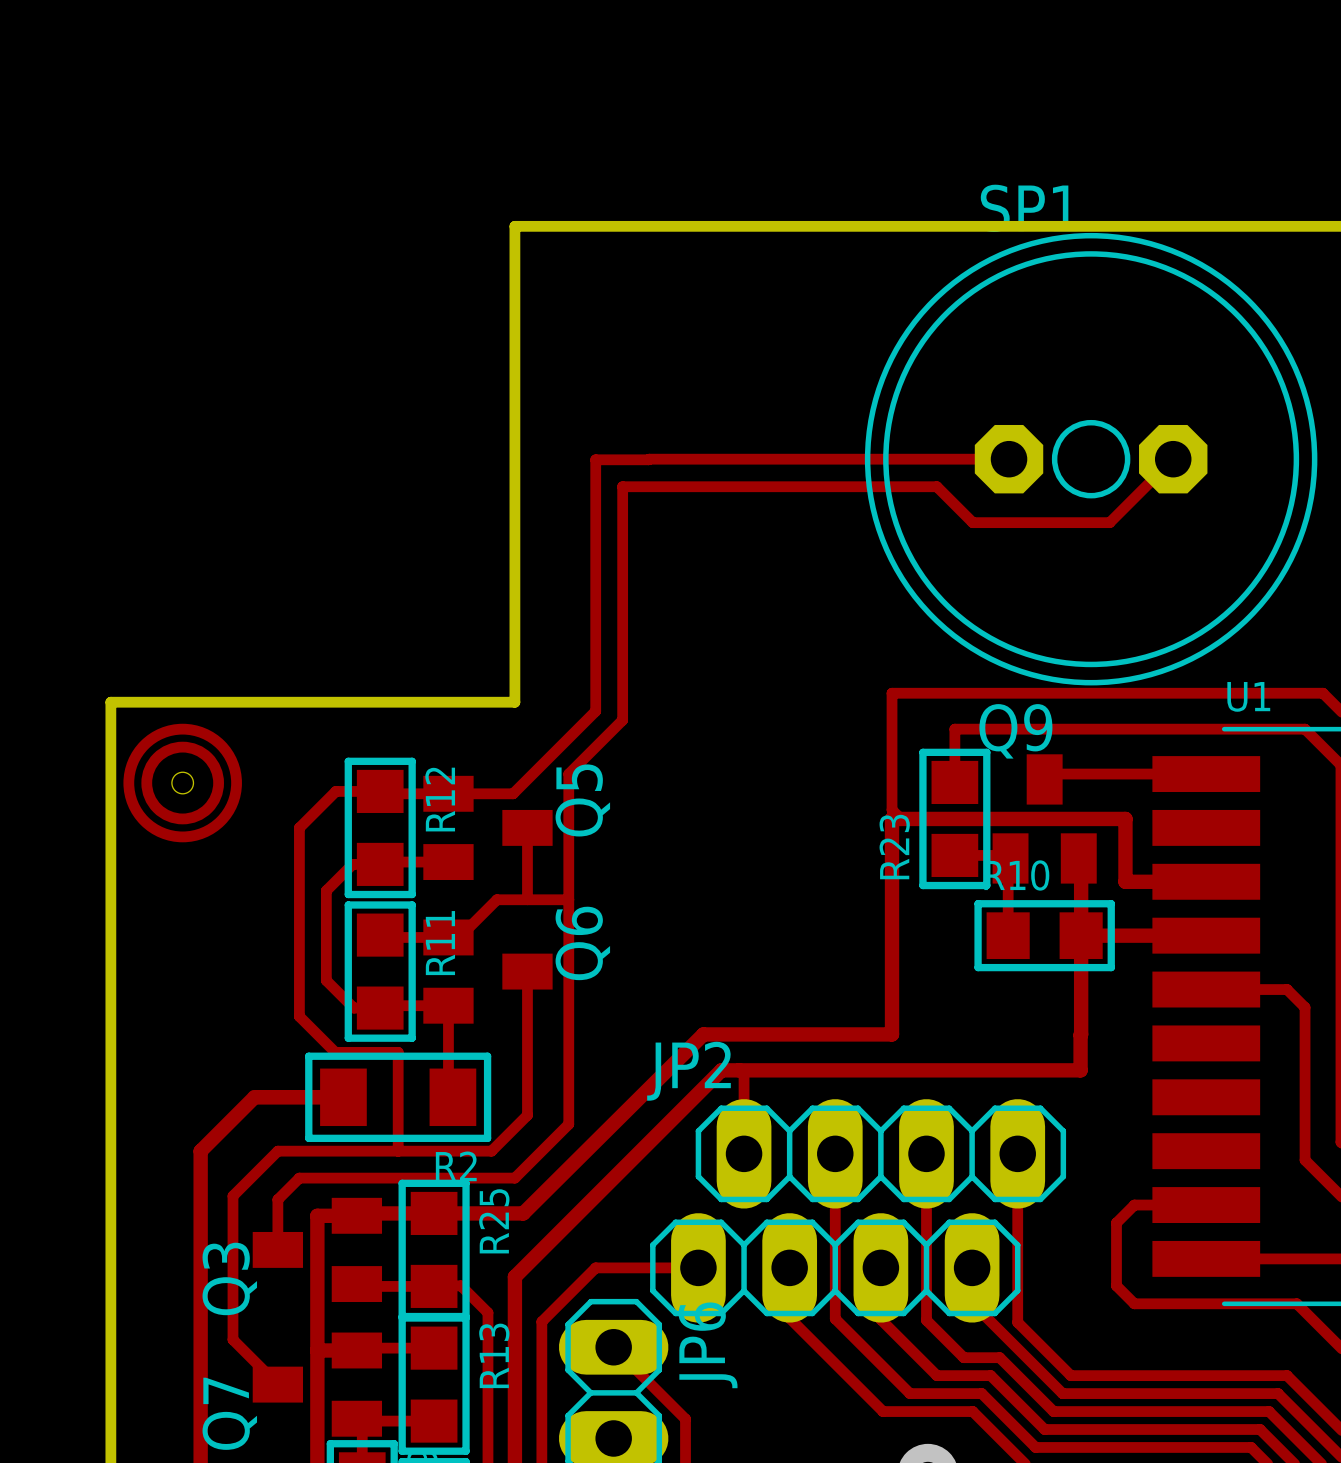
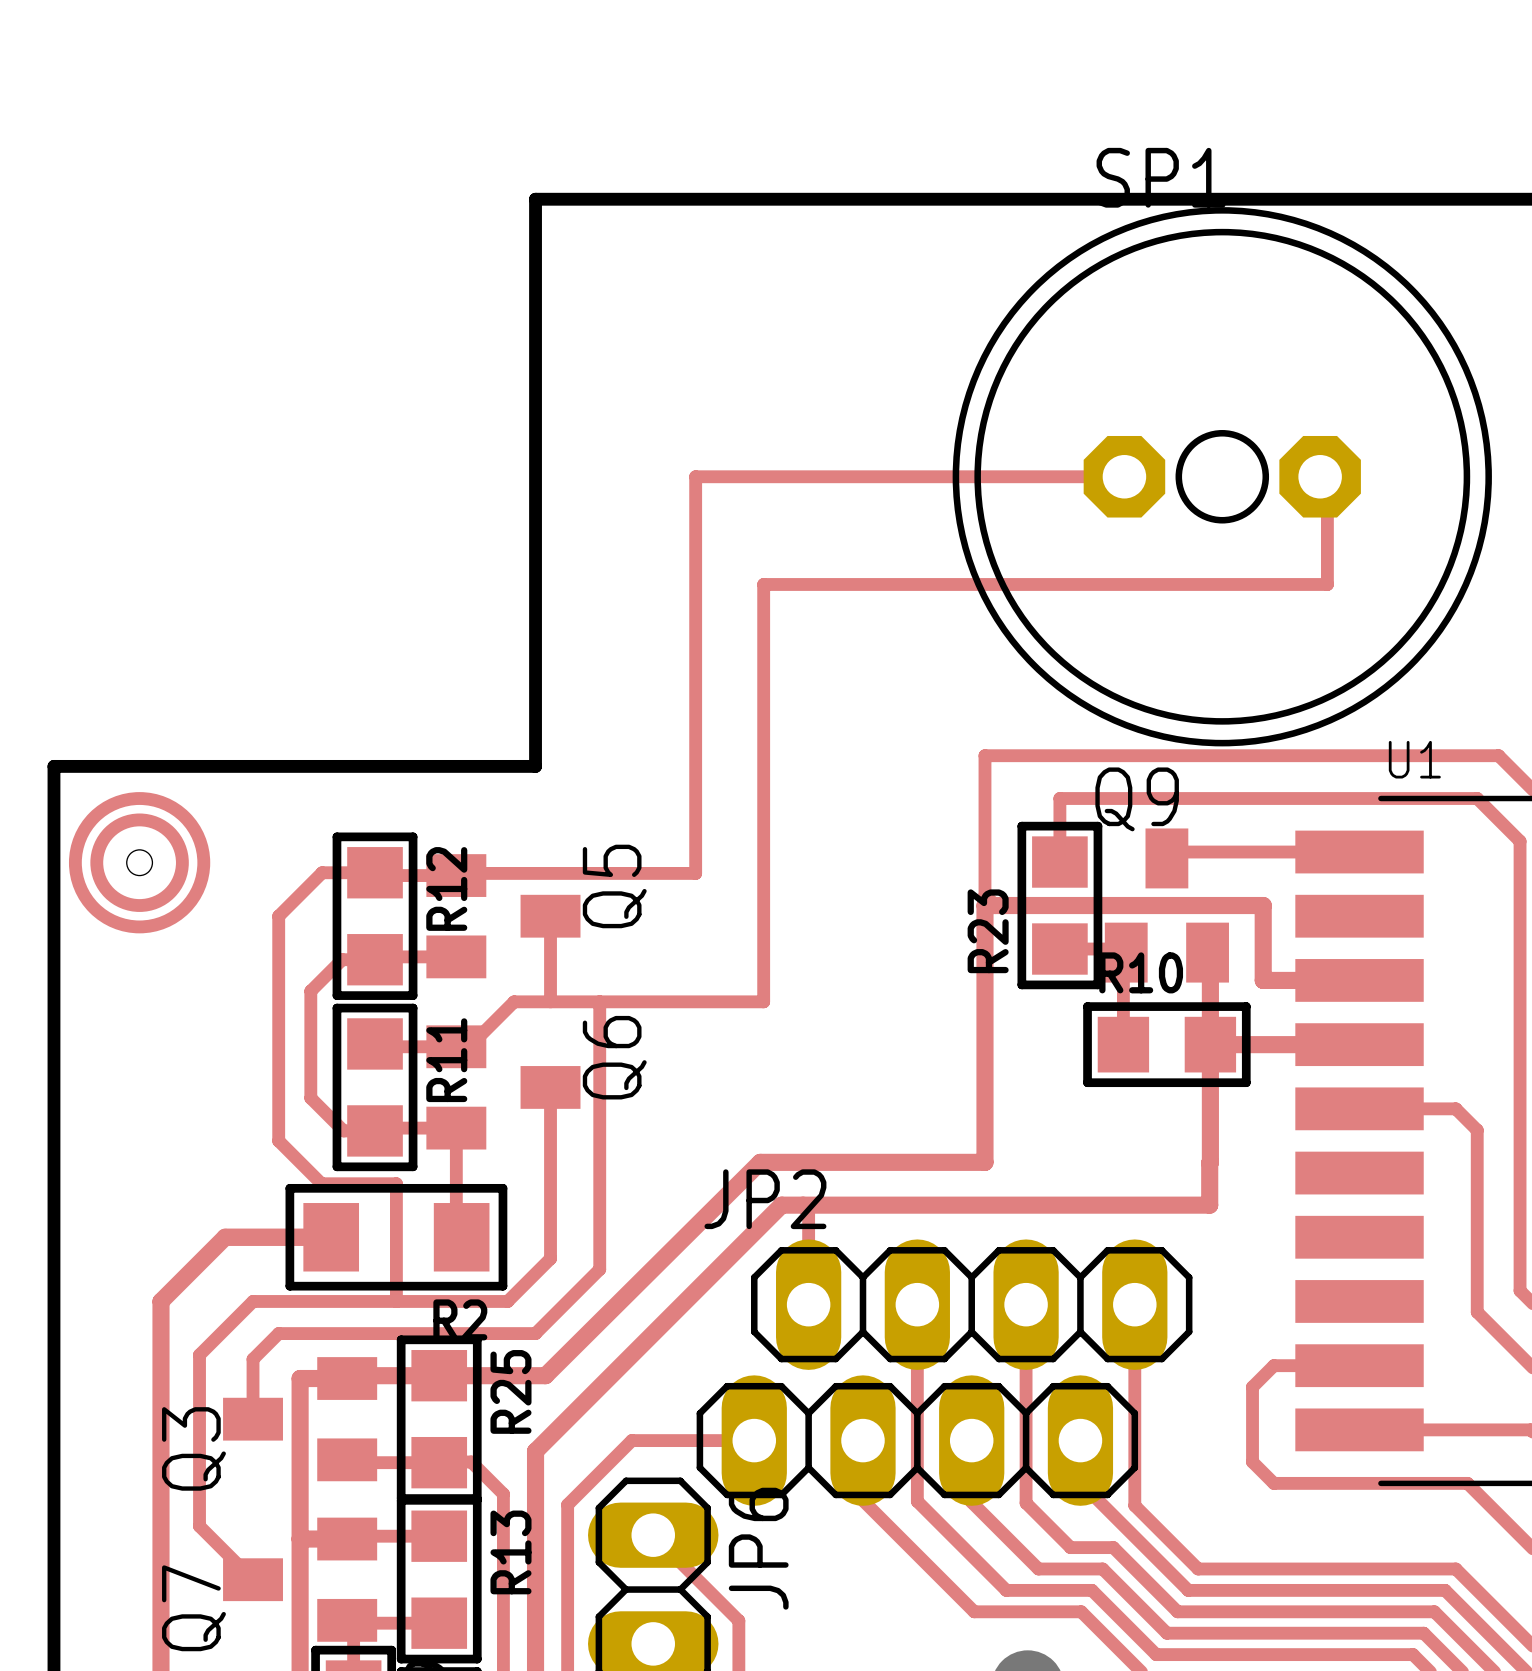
track: (649, 459) (595, 459) (595, 711) (513, 793) (448, 793) -> (695, 476) (695, 873) (471, 873)
track: (1173, 459) (1109, 522) (972, 522) (936, 486) (622, 486) (622, 720) (568, 774) (568, 899) -> (1320, 476) (1327, 476) (1327, 584) (763, 584) (763, 1001) (599, 1001)

